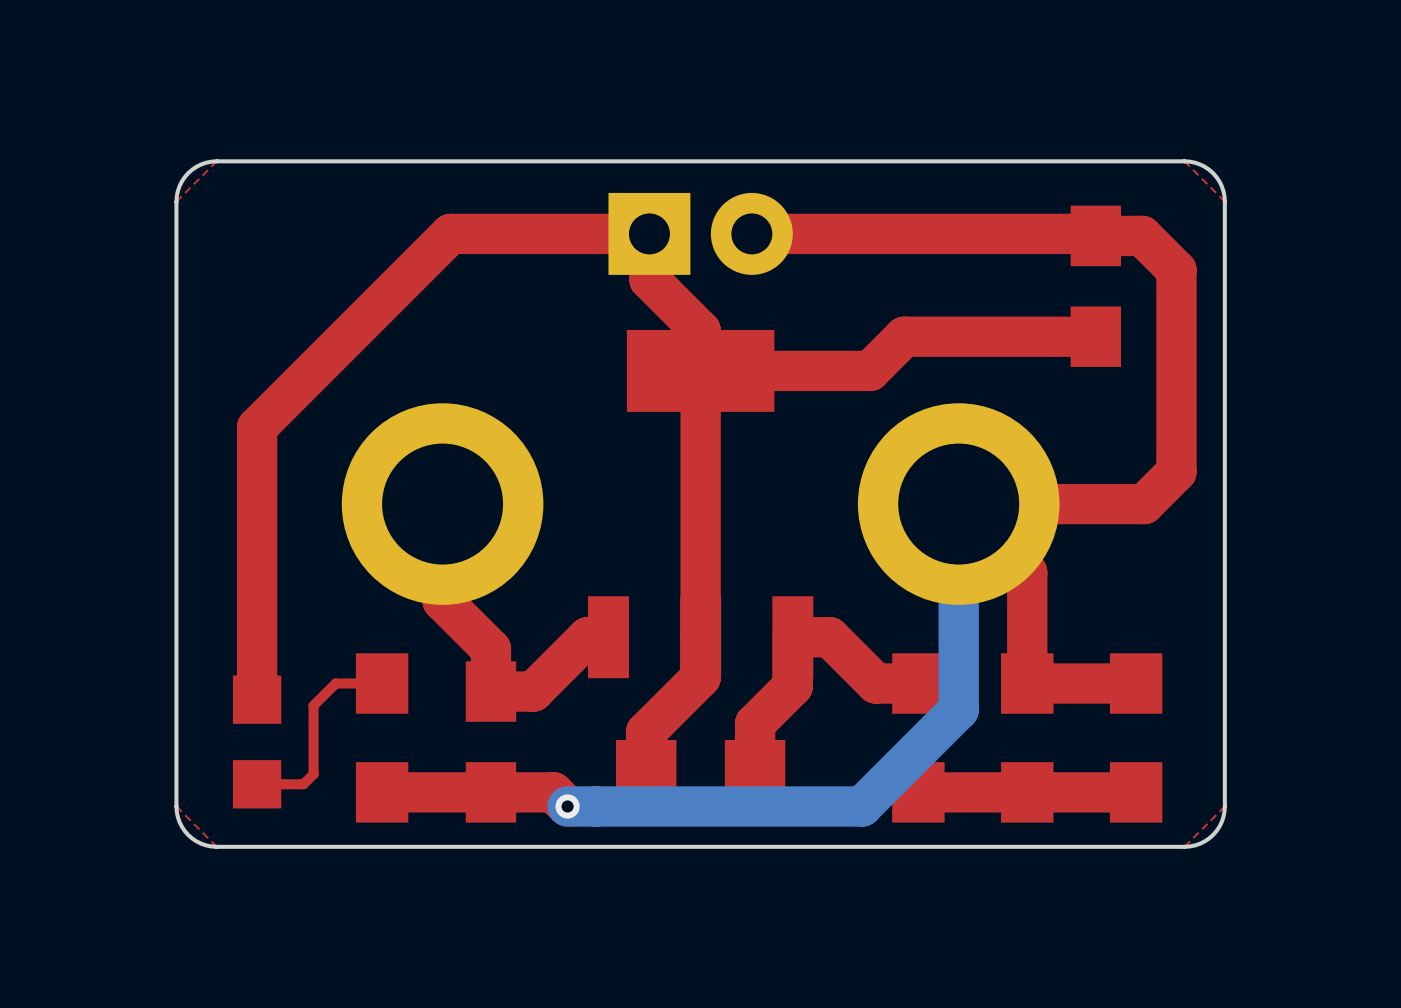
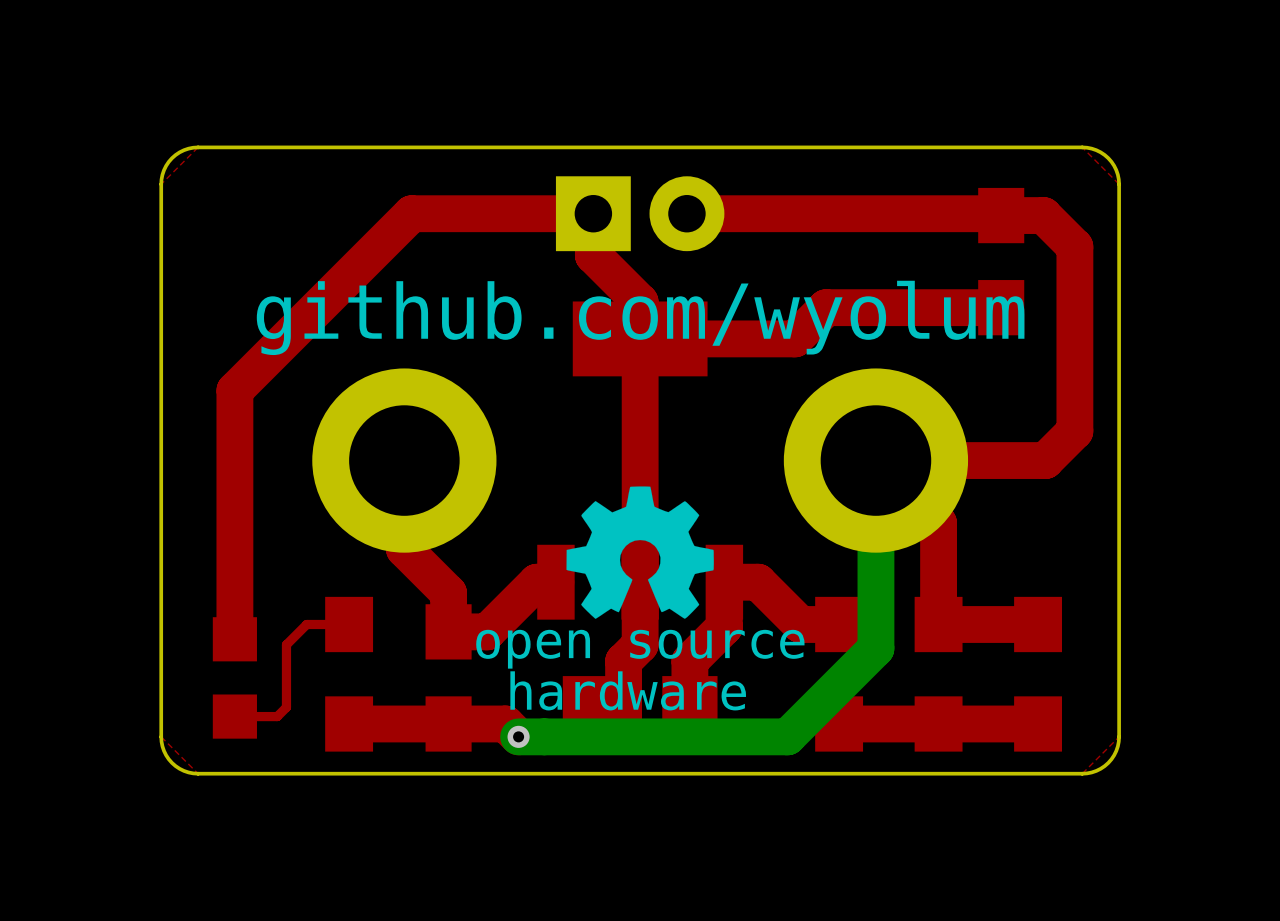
text: none -> github.com/wyolum (640, 317)
drawing: none -> [566, 486, 714, 619]
top track: (700, 677) (646, 731) (646, 766) -> (640, 618) (640, 644) (623, 661) (623, 725)
text: none -> open source (640, 649)
text: none -> hardware (628, 690)

